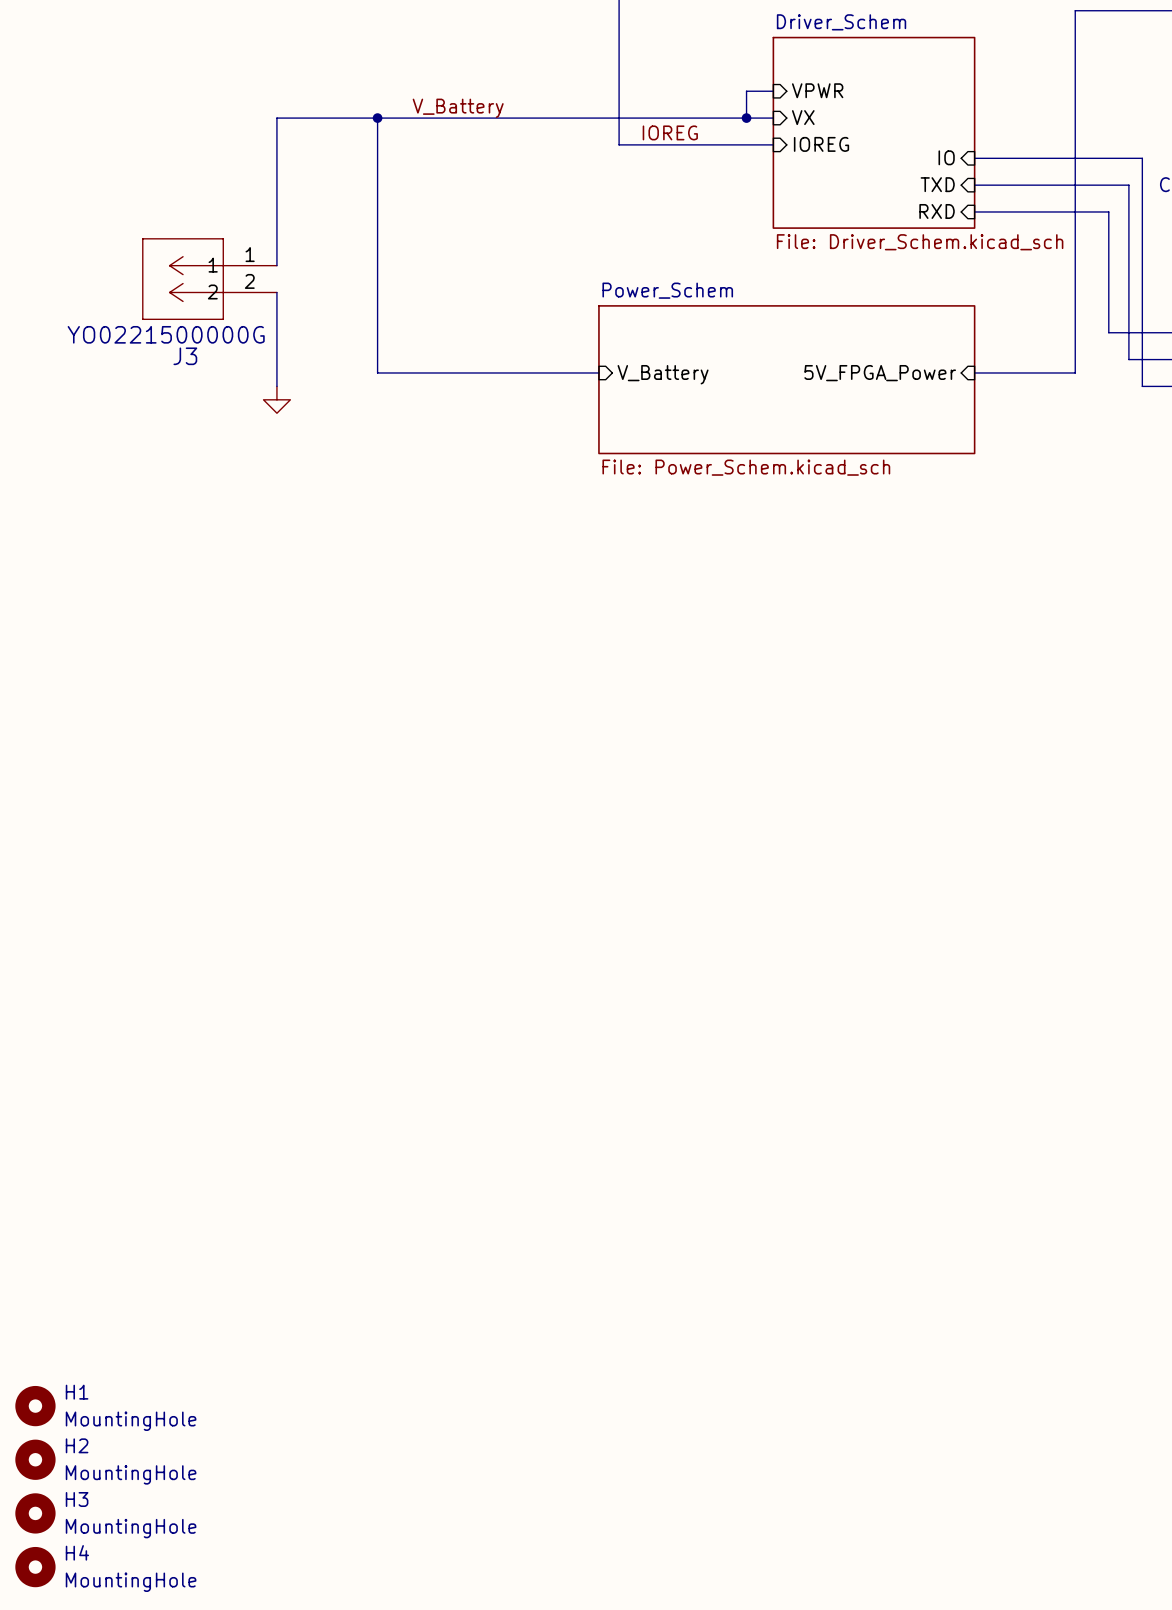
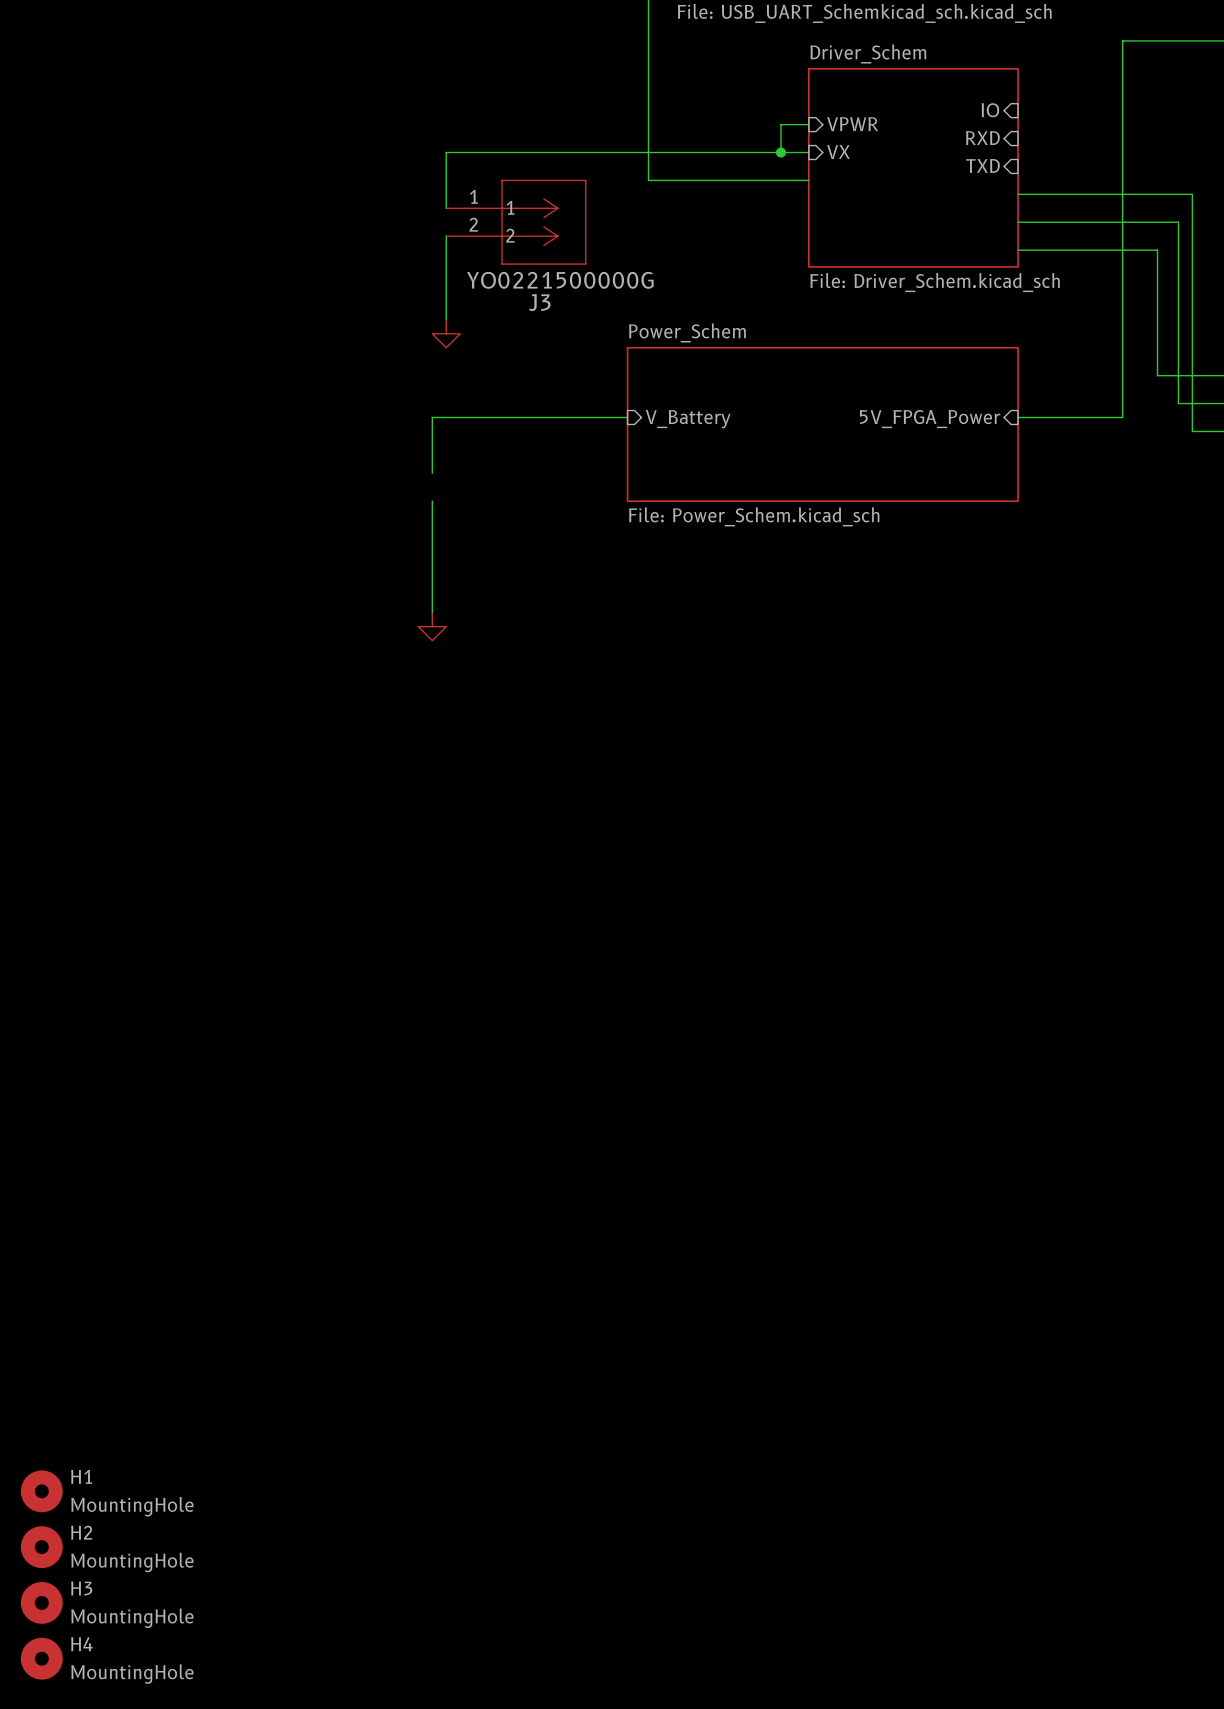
label: V_Battery (458, 108) -> none
wire: (377, 118) (377, 372) (411, 372) -> (432, 473) (432, 417)
junction: (377, 118) -> none
wire: (424, 118) (276, 118) (276, 265) -> (446, 152) (446, 208)
label: IOREG (670, 132) -> none
sheet pin: IOREG (821, 144) -> none
sheet pin position: IO (946, 157) -> IO (990, 110)
sheet pin position: TXD (937, 184) -> TXD (983, 165)
wire: none -> (446, 236) (446, 319)
sheet pin position: RXD (937, 211) -> RXD (982, 138)
J3 flip: as is (183, 279) -> left-right (543, 222)
J3 position: (209, 279) -> (516, 222)
wire: (276, 292) (276, 386) -> none
power symbol: none -> (446, 333)
power symbol: (276, 399) -> none
wire: none -> (432, 501) (432, 612)
power symbol: none -> (432, 626)

